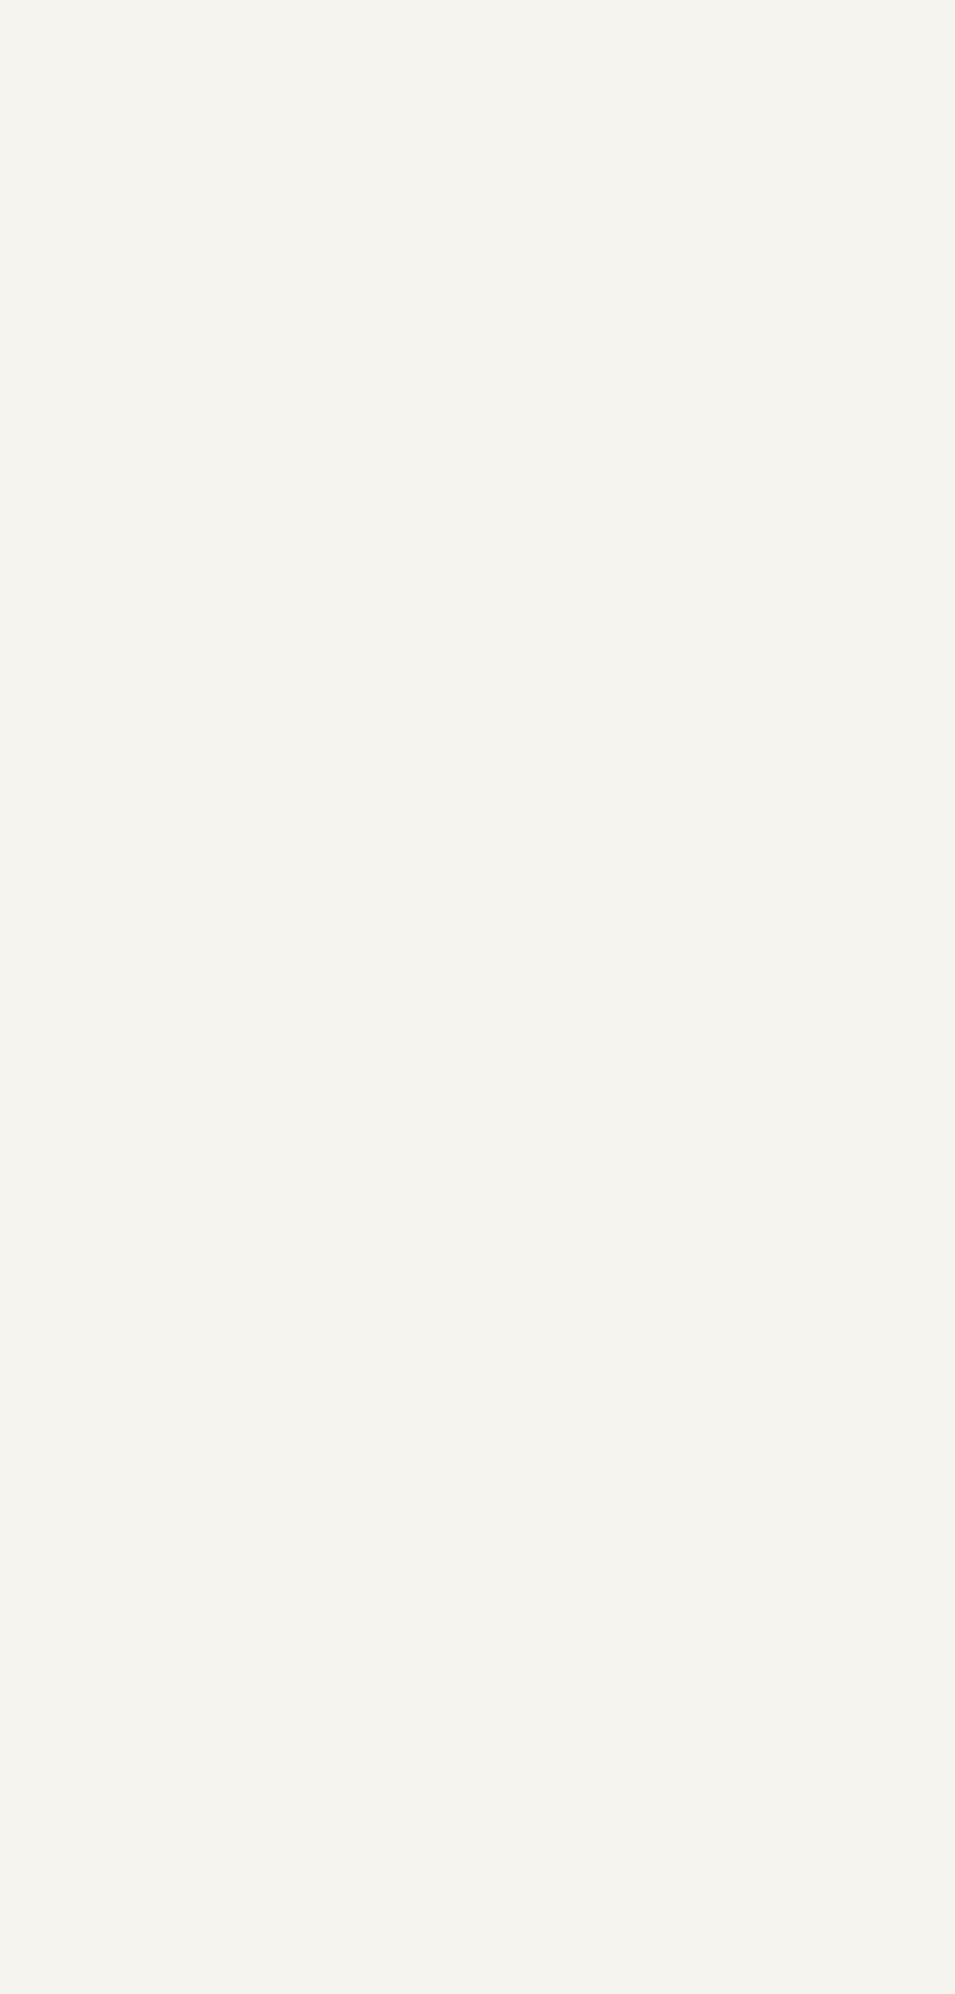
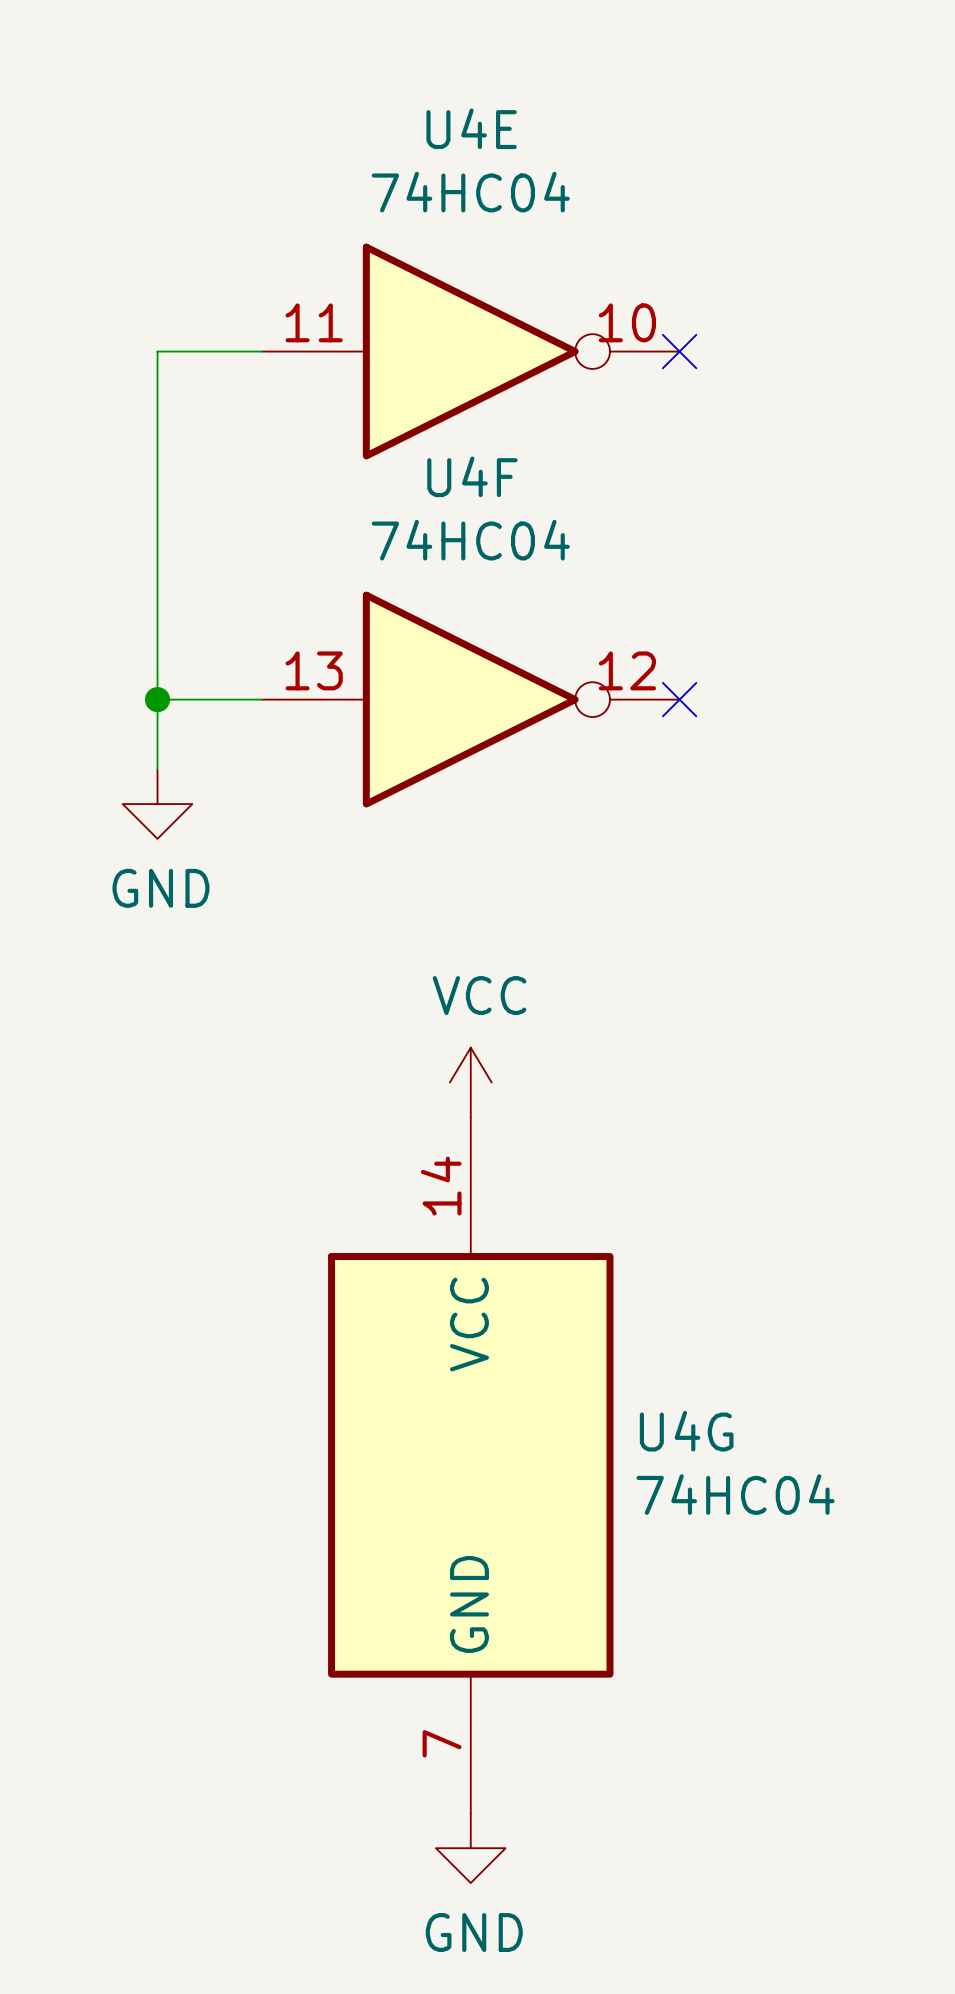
wire: none -> (261, 351) (157, 351) (157, 769)
U4E: none -> 74HC04 (470, 351)
no-connect mark: none -> (679, 351)
wire: none -> (157, 699) (261, 699)
junction: none -> (157, 699)
U4F: none -> 74HC04 (470, 699)
no-connect mark: none -> (679, 699)
power symbol: none -> GND (157, 804)
power symbol: none -> VCC (470, 1082)
U4G: none -> 74HC04 (470, 1465)
power symbol: none -> GND (470, 1848)

